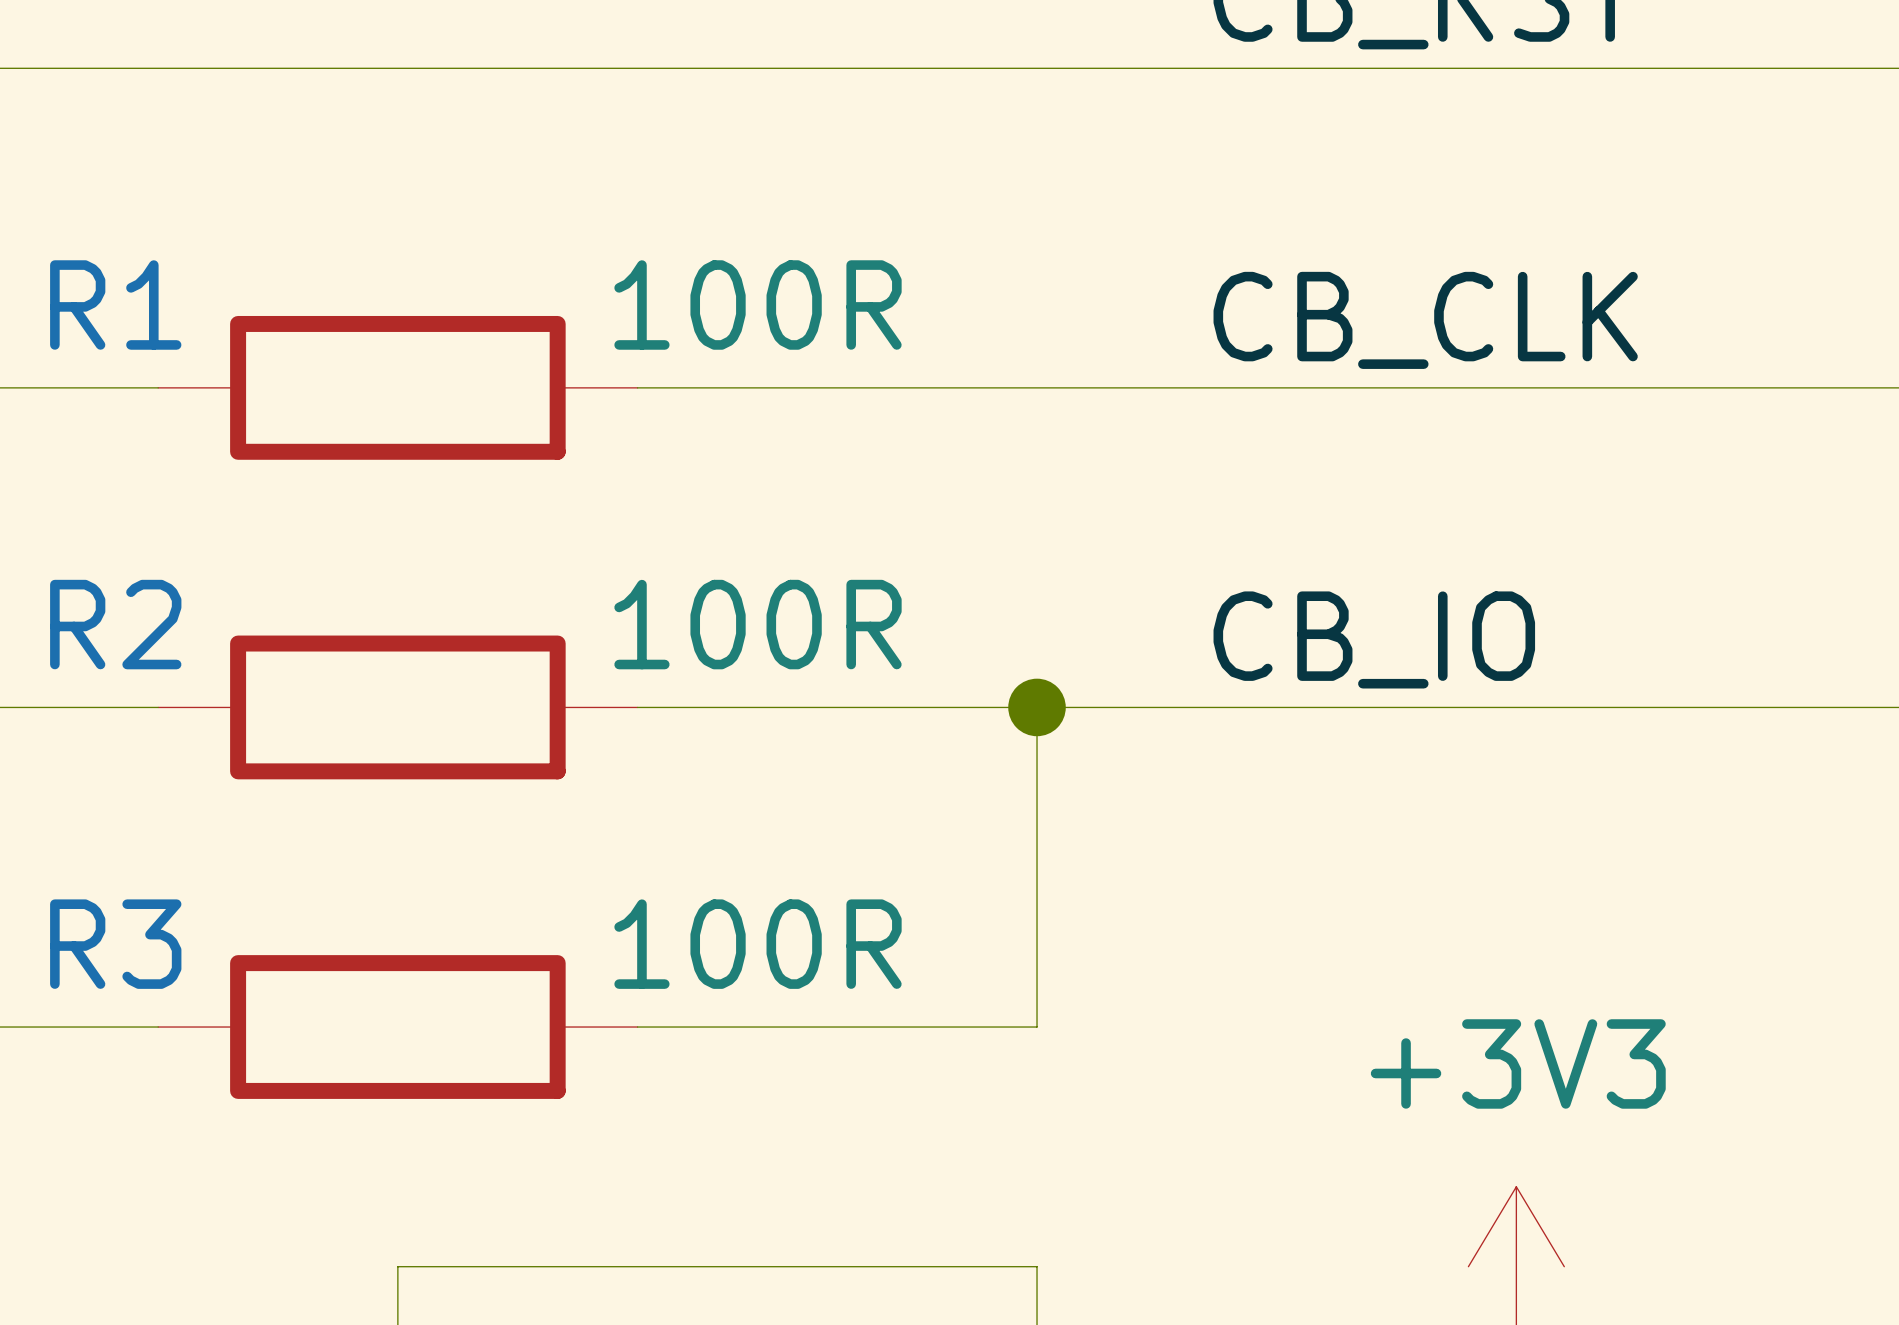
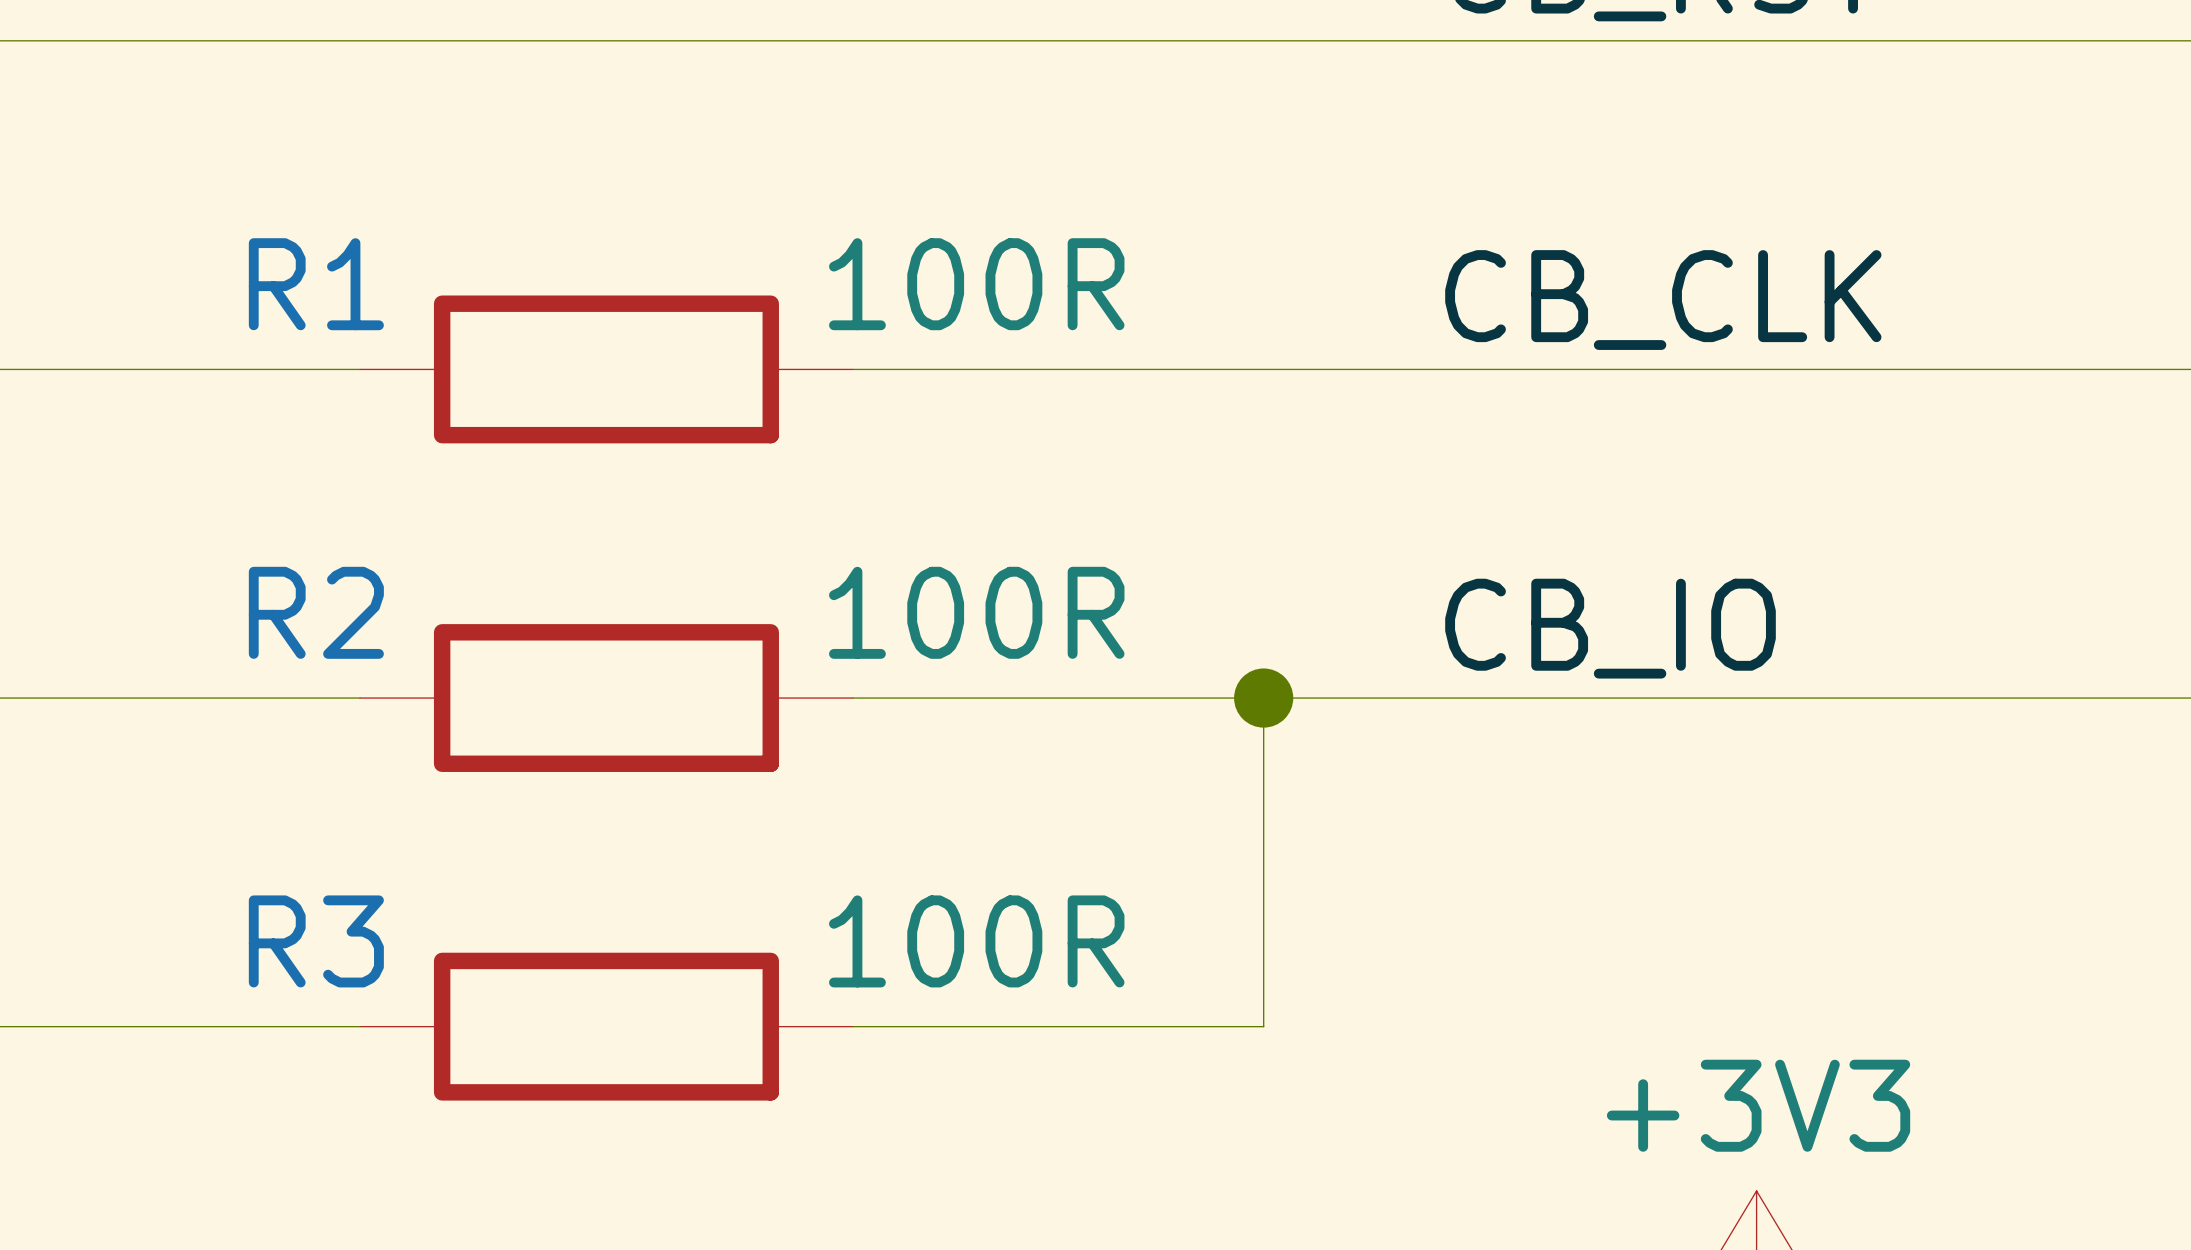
power symbol text position: +3V3 (1518, 1063) -> +3V3 (1758, 1105)

